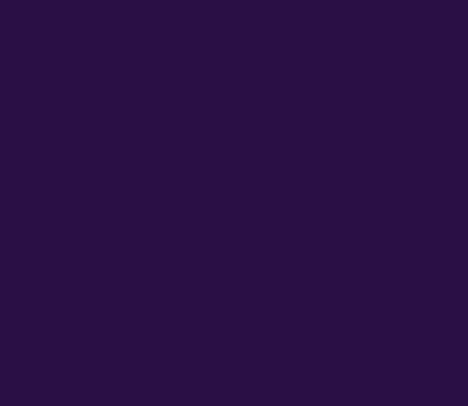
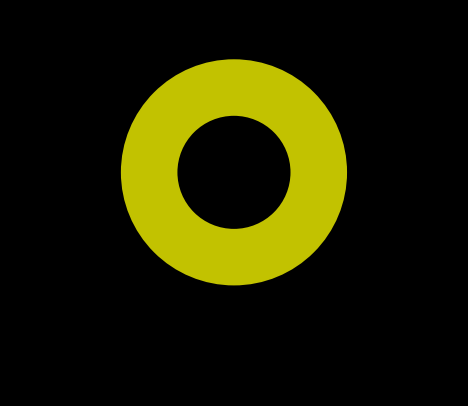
part: none -> (233, 172)

